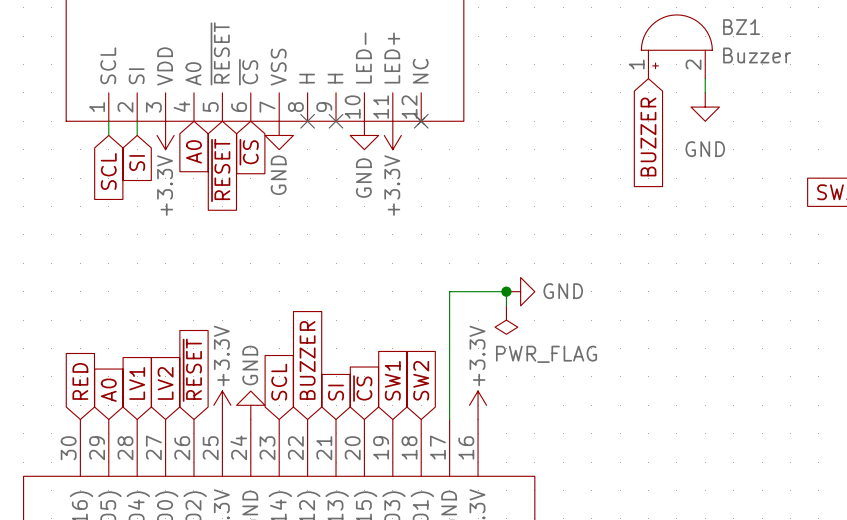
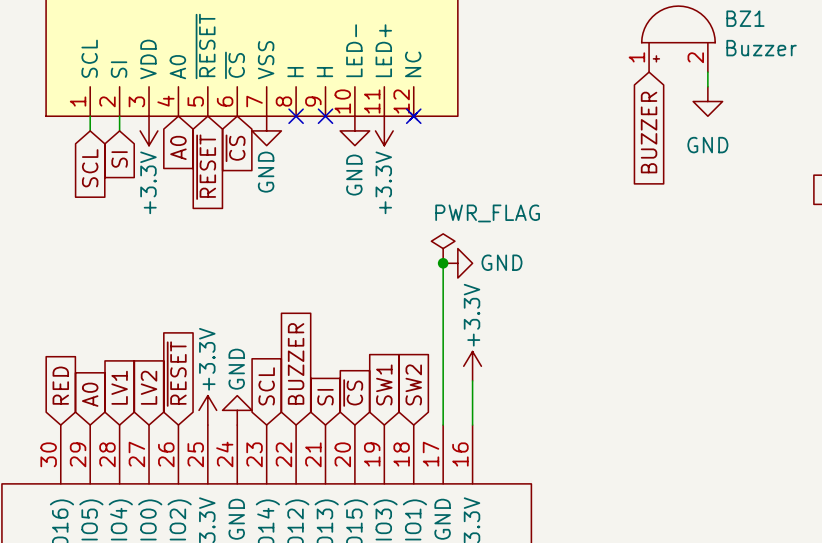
wire: (449, 291) (506, 291) (506, 305) -> (443, 292) (443, 263)
junction position: (506, 291) -> (443, 263)
power symbol position: GND (520, 291) -> GND (457, 263)
power symbol rotation: 0° (506, 320) -> 180° (443, 248)
power symbol position: PWR_FLAG (506, 320) -> PWR_FLAG (443, 248)
power symbol text position: PWR_FLAG (546, 354) -> PWR_FLAG (487, 213)
power symbol position: +3.3V (478, 405) -> +3.3V (472, 366)

